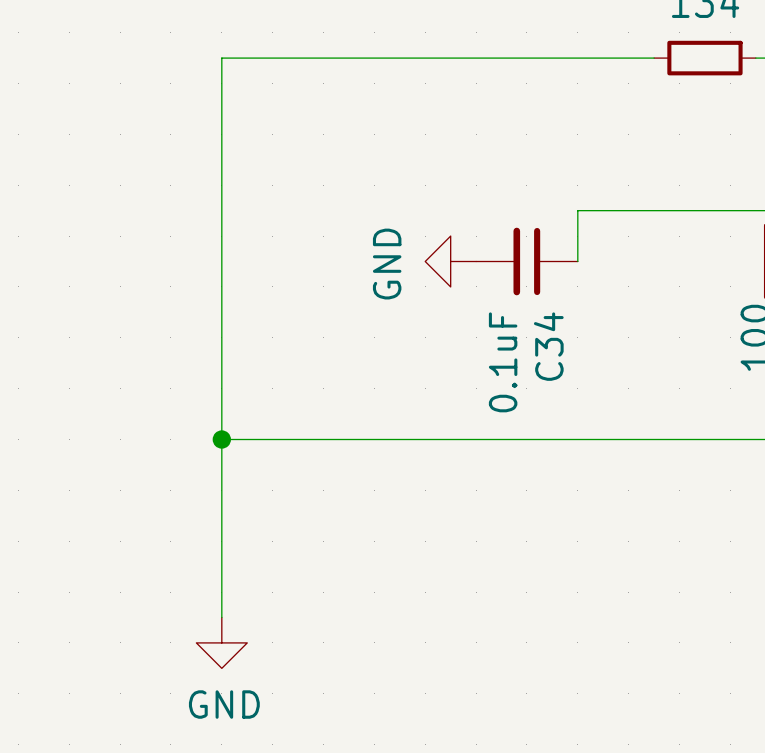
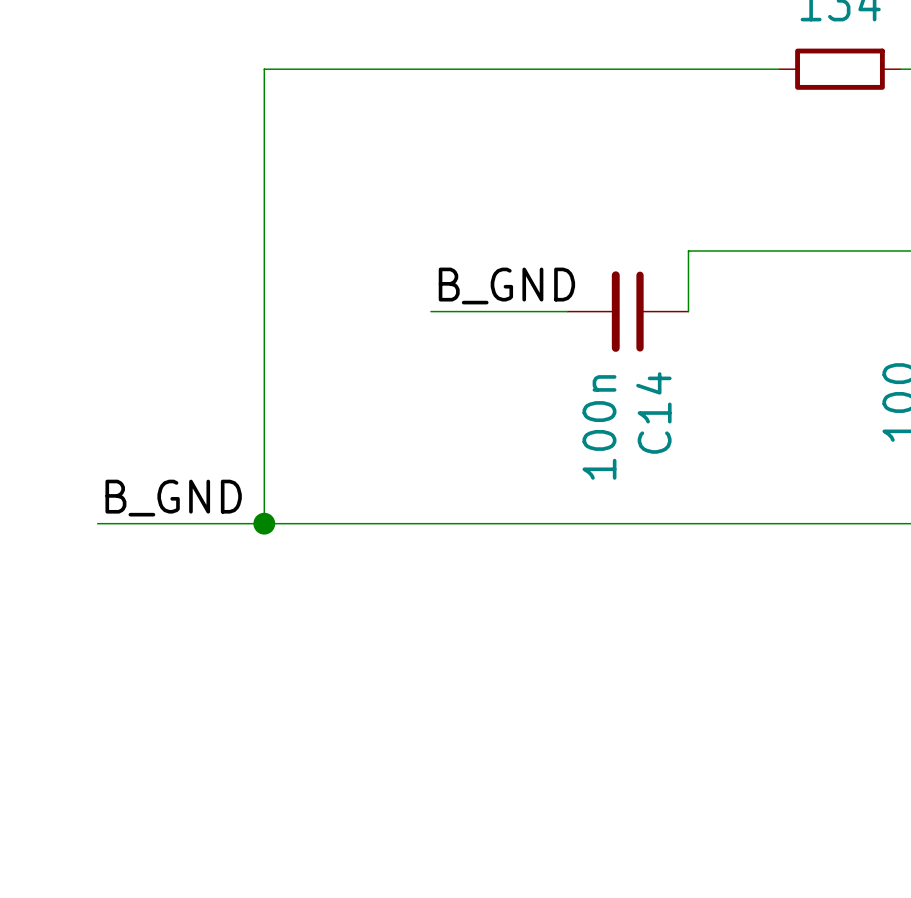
label: none -> B_GND (506, 285)
wire: none -> (430, 311) (567, 311)
power symbol: GND (450, 261) -> none
C34 name: C34 (548, 346) -> C14 (653, 413)
C34 value: 0.1uF (503, 362) -> 100n (599, 427)
label: none -> B_GND (173, 498)
wire: (221, 439) (221, 617) -> (264, 523) (97, 523)
power symbol: GND (221, 642) -> none

